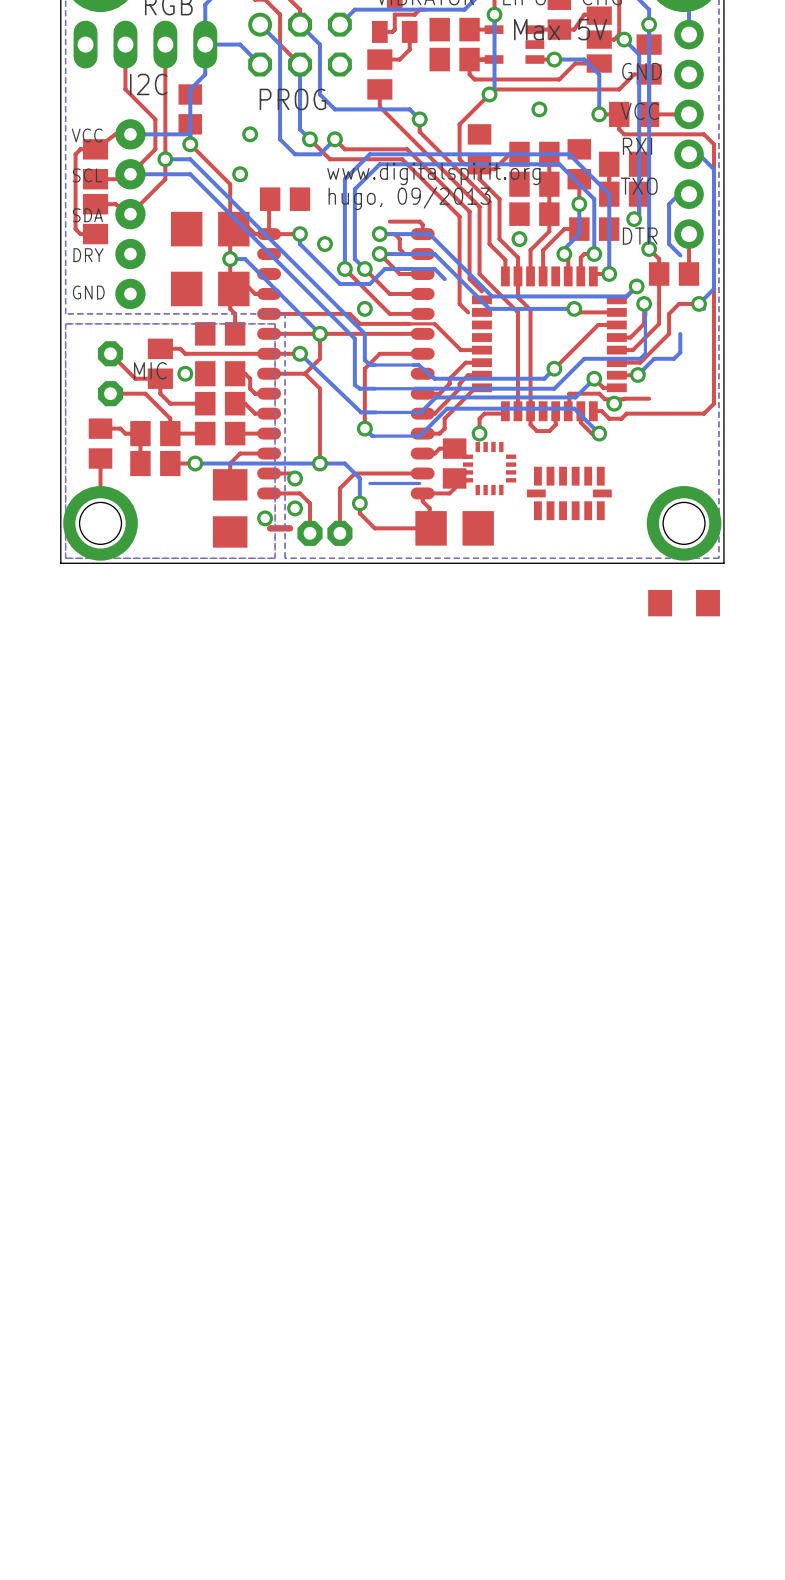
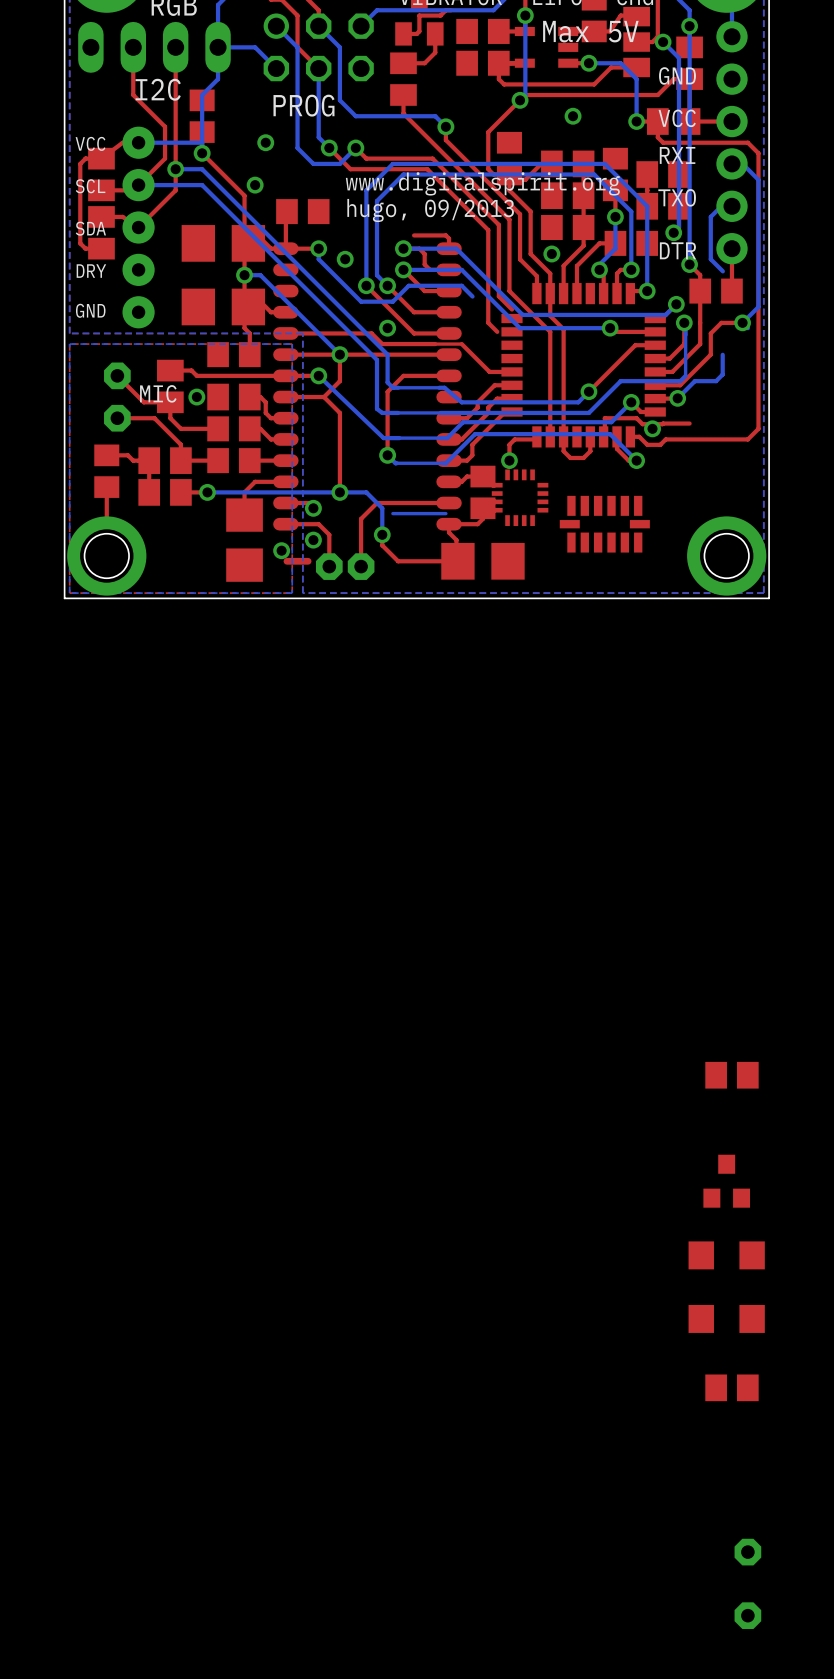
part: (684, 603) -> none
part: none -> (731, 1075)
part: none -> (726, 1181)
part: none -> (726, 1255)
part: none -> (726, 1318)
part: none -> (731, 1387)
part: none -> (747, 1552)
part: none -> (747, 1615)

